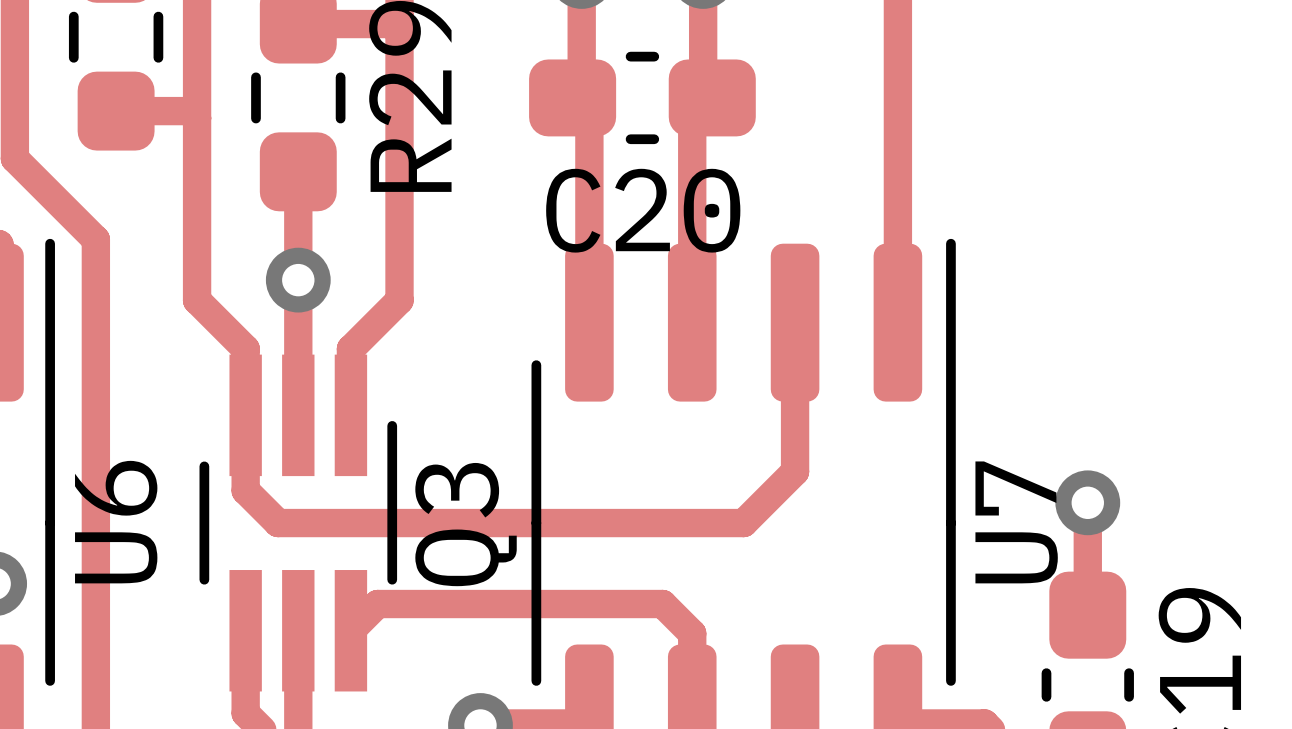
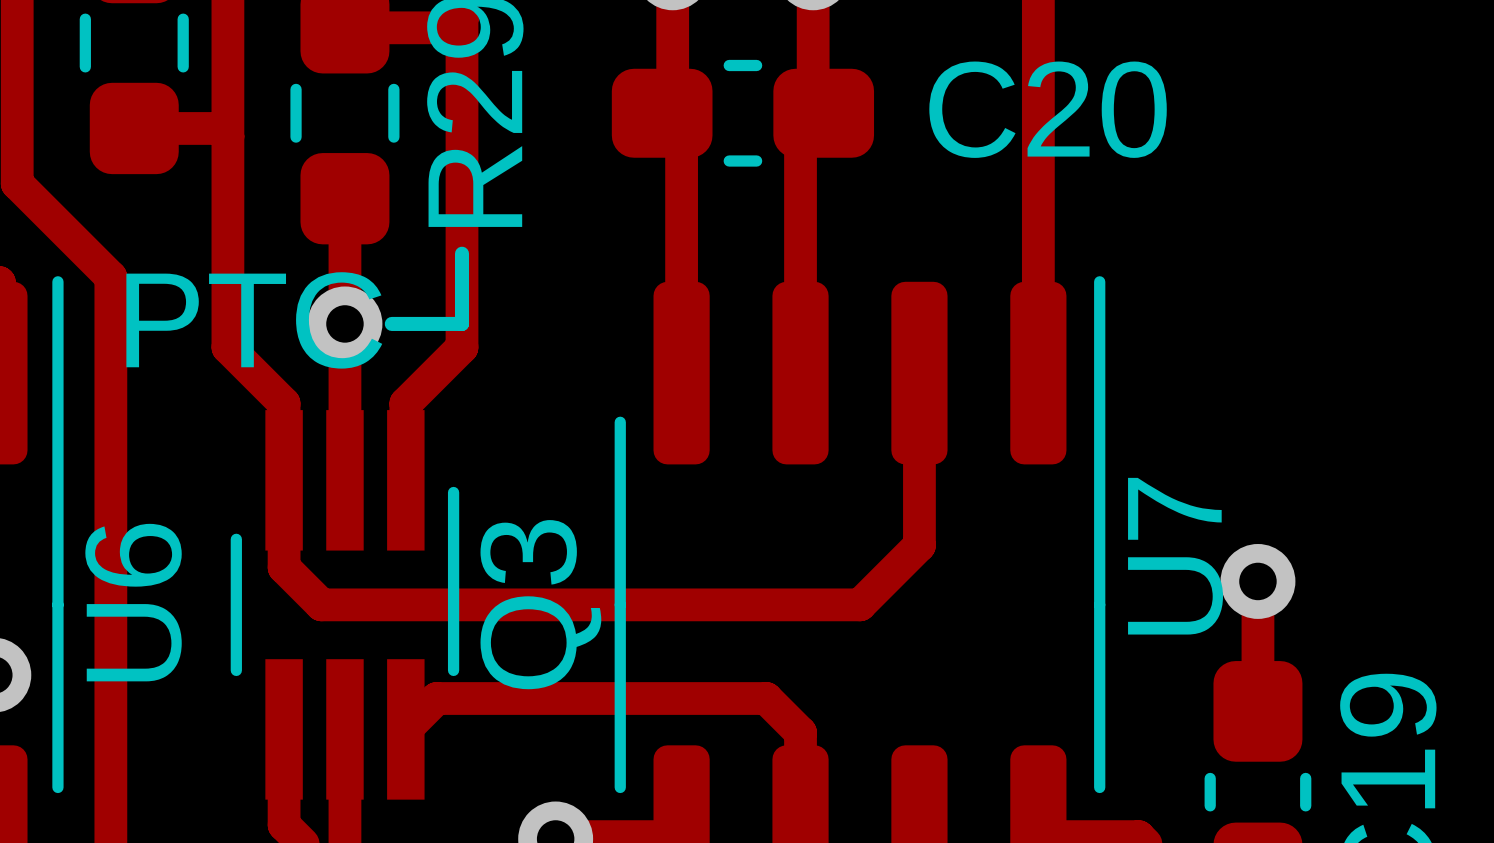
C20 name position: C20 (643, 210) -> C20 (1048, 109)
line: none -> (462, 253) (462, 323) (391, 323)
text: none -> PTC (254, 320)
U7 name position: U7 (1016, 522) -> U7 (1175, 556)

